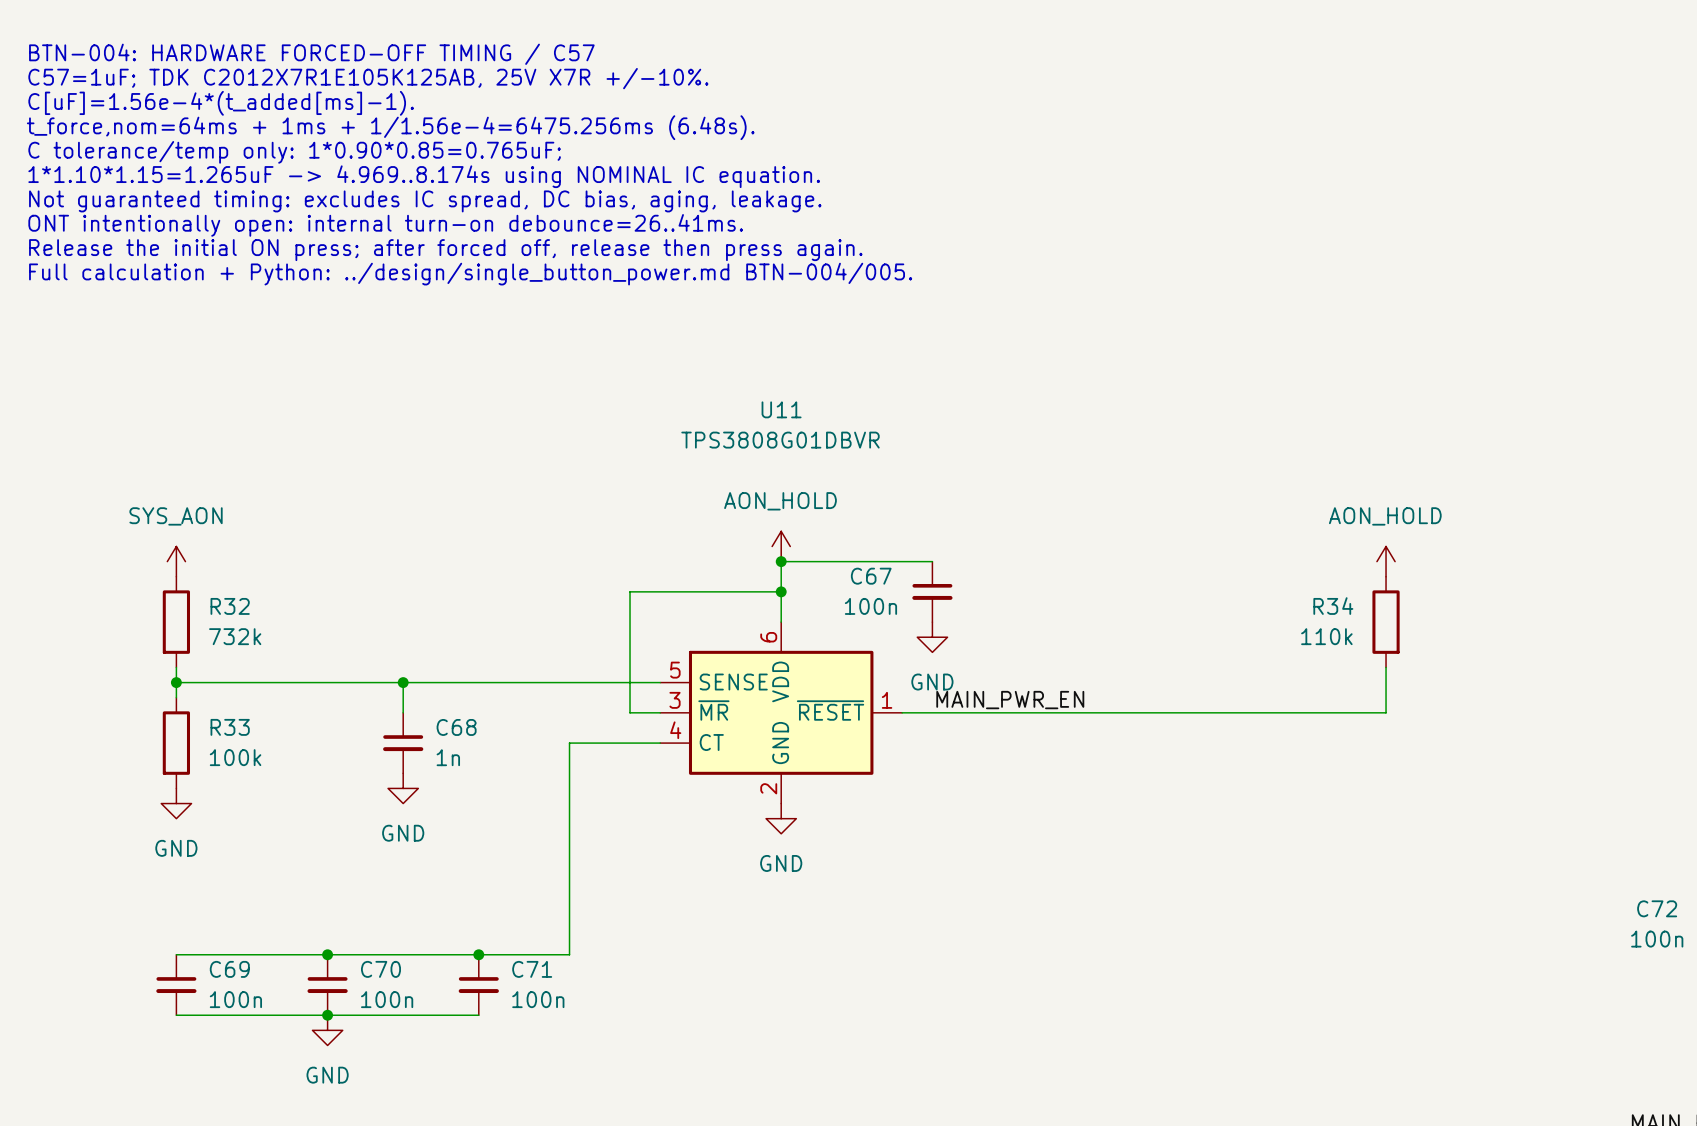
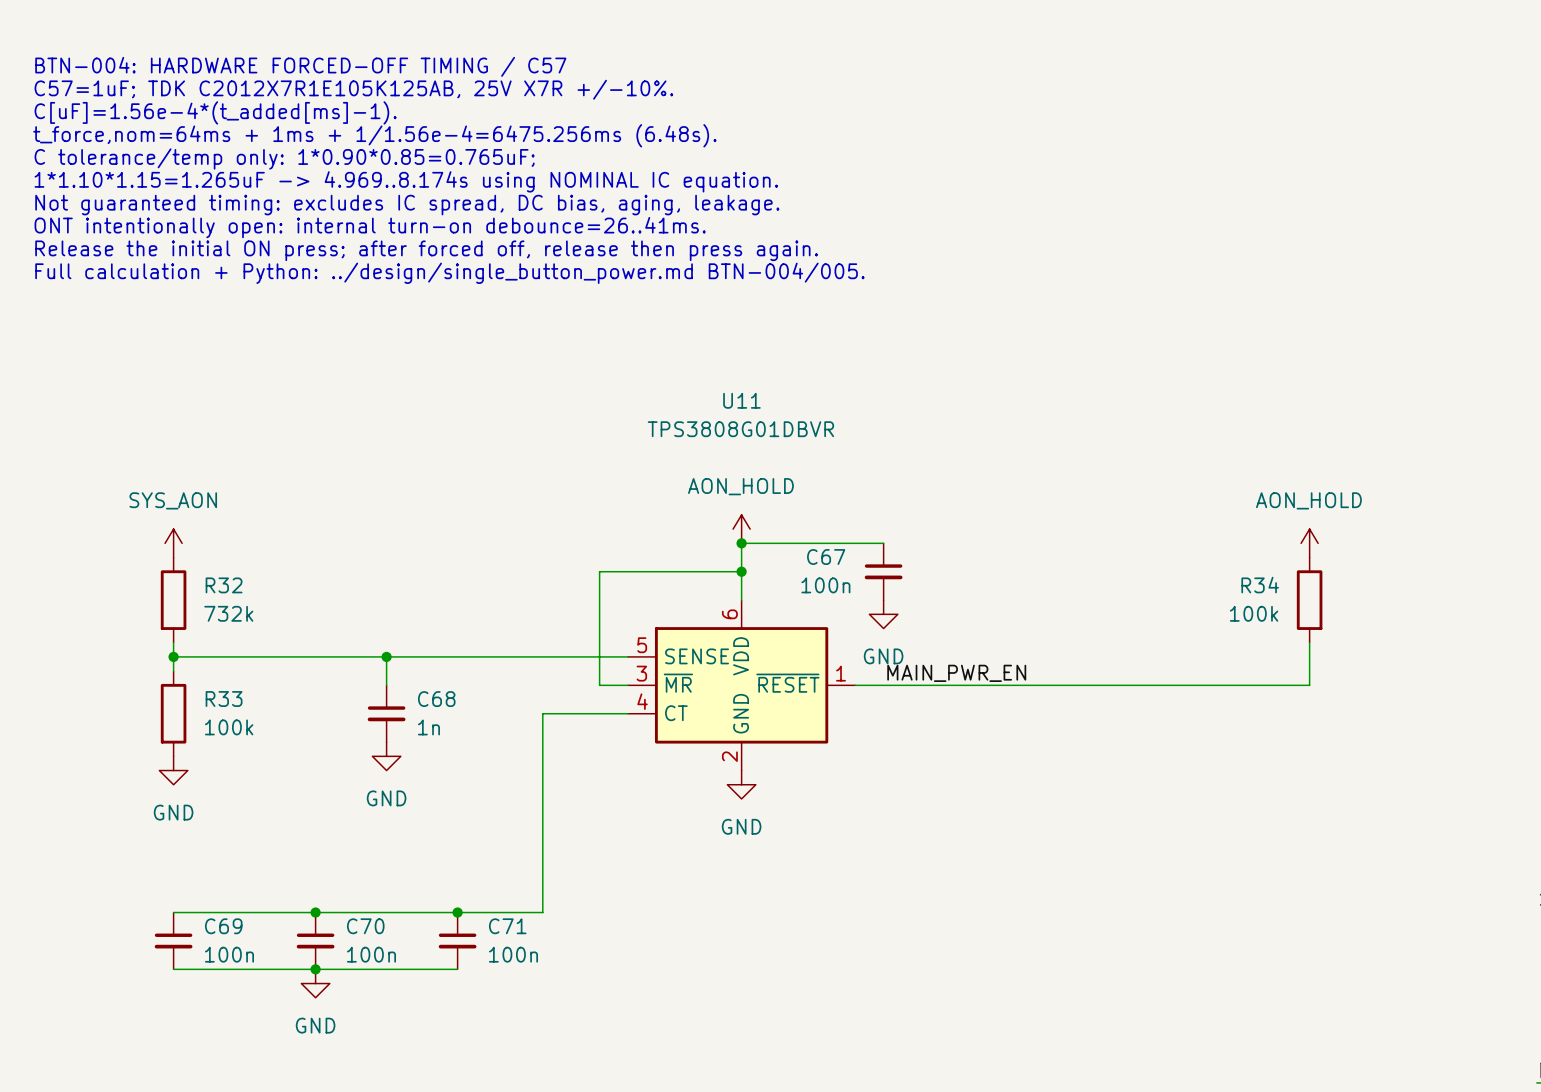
R34 value: 110k (1326, 636) -> 100k (1254, 613)

